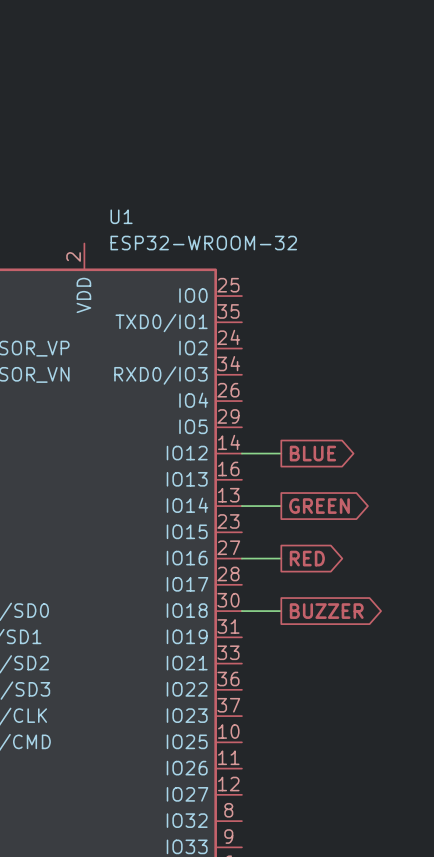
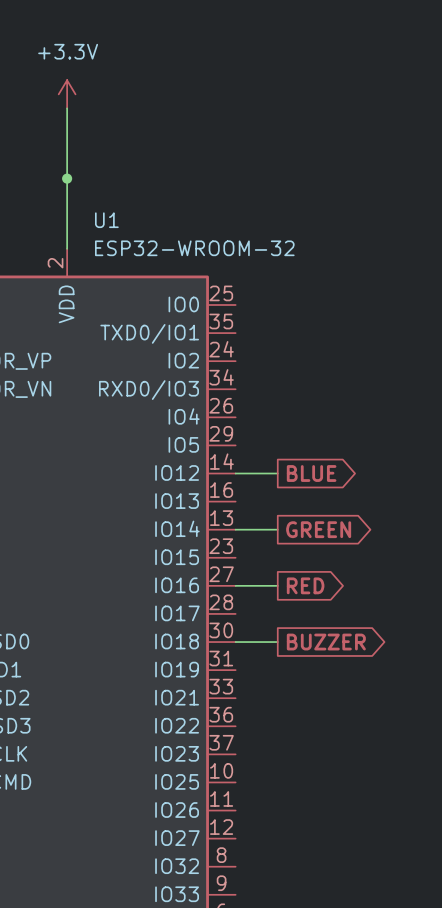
power symbol: none -> +3.3V (67, 94)
wire: none -> (67, 108) (67, 248)
junction: none -> (67, 178)

